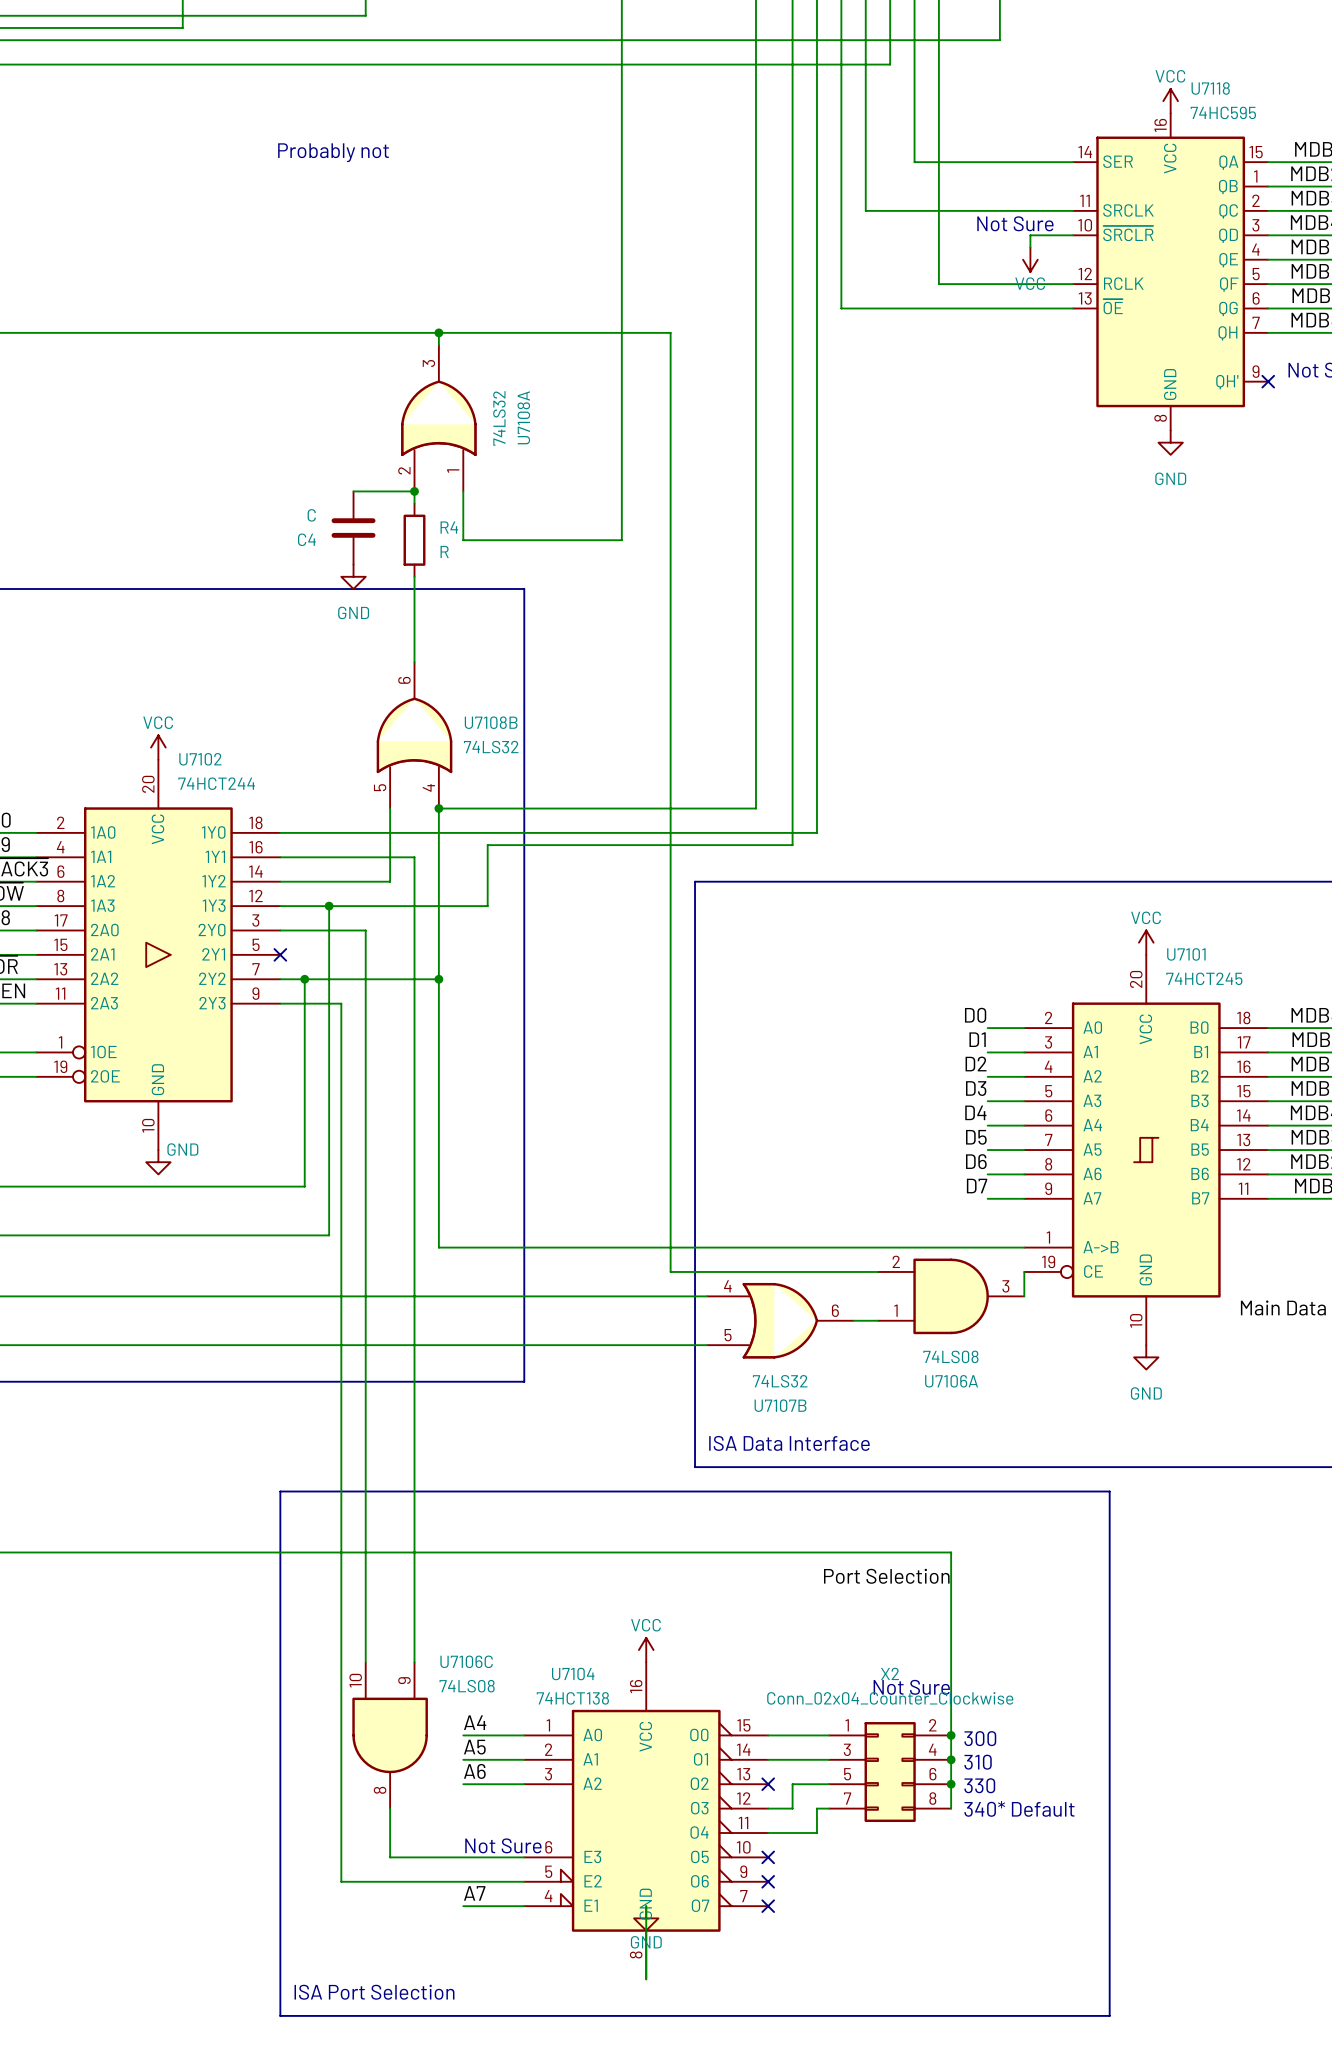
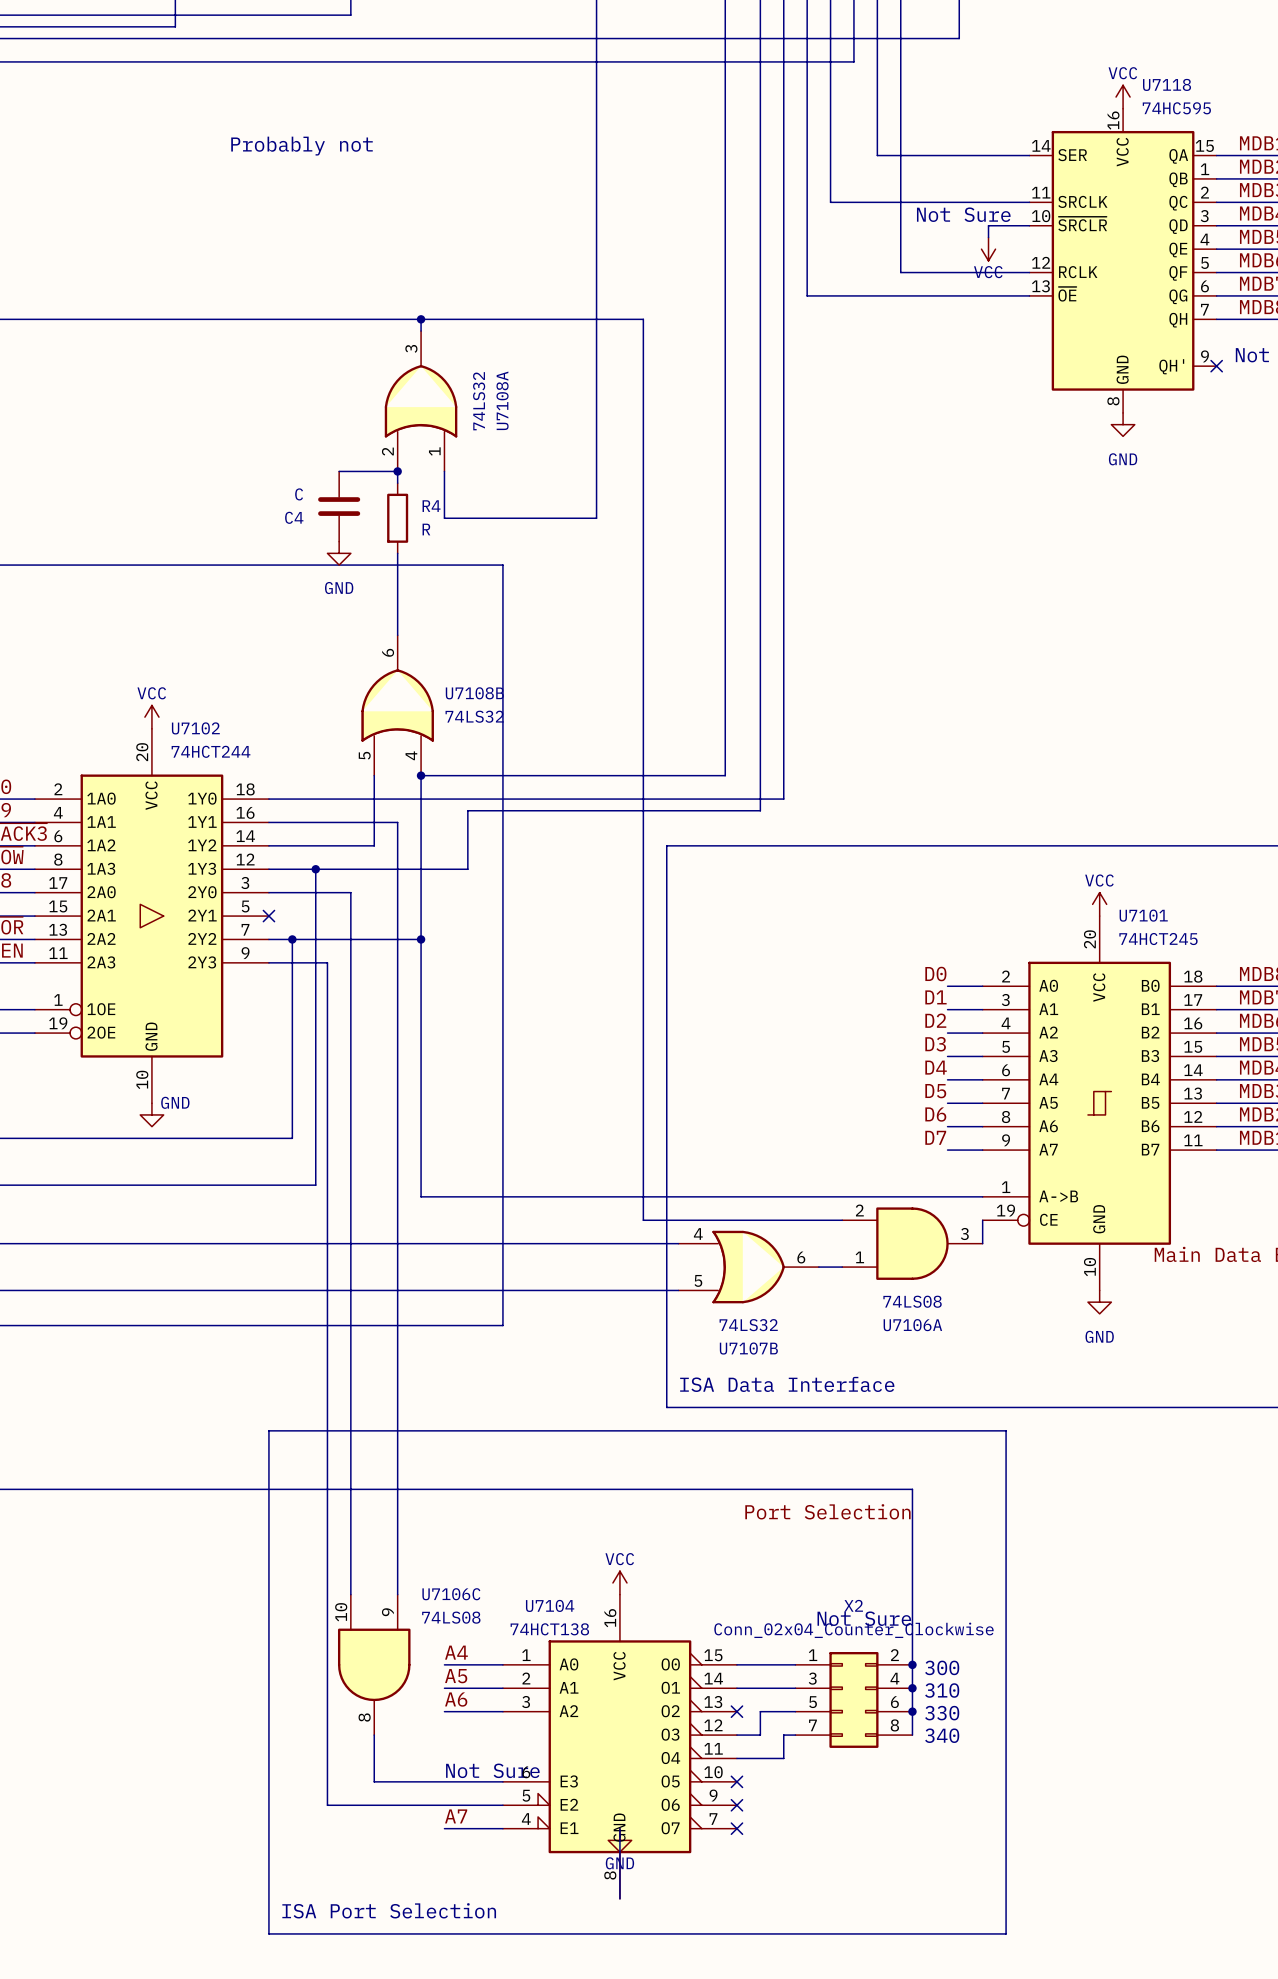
line: (1048, 1491) (1109, 1491) (1109, 2015) (1048, 2015) -> (1006, 1430) (1006, 1933)
text: 340* Default (1019, 1808) -> 340 (942, 1735)

